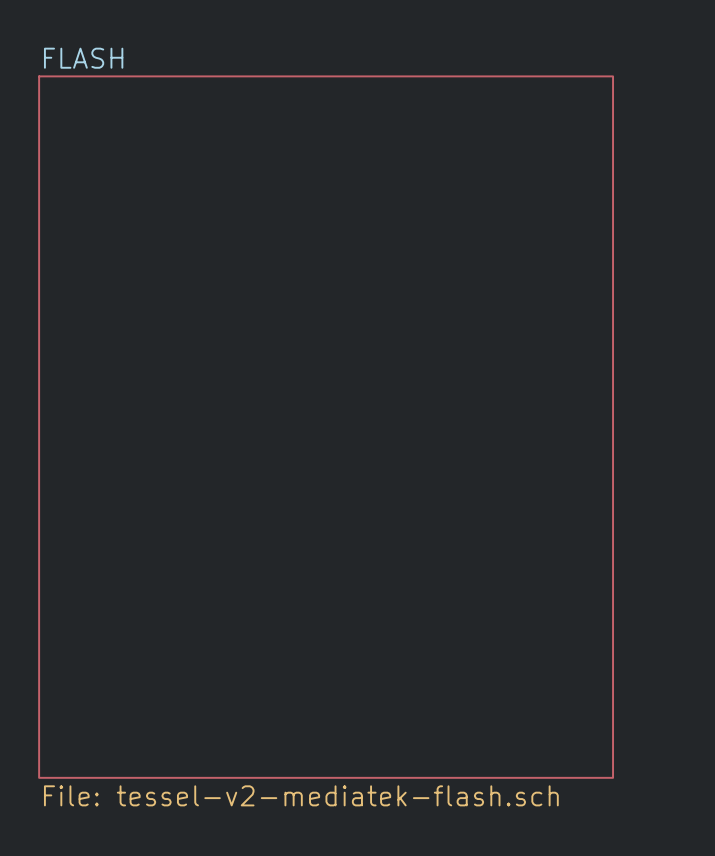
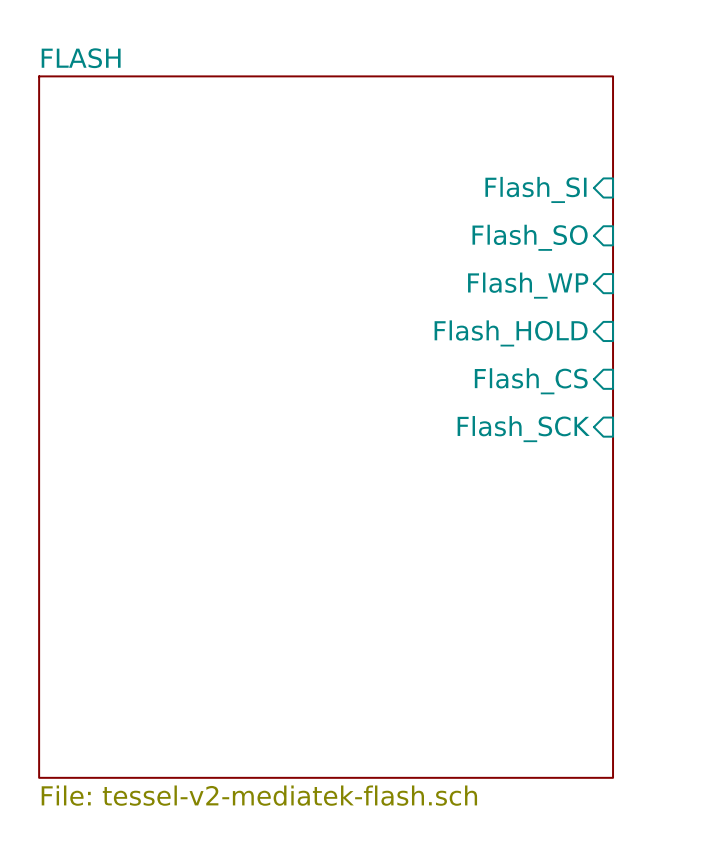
sheet pin: none -> Flash_SI (535, 189)
sheet pin: none -> Flash_SO (530, 237)
sheet pin: none -> Flash_WP (528, 285)
sheet pin: none -> Flash_HOLD (511, 333)
sheet pin: none -> Flash_CS (531, 381)
sheet pin: none -> Flash_SCK (523, 429)

